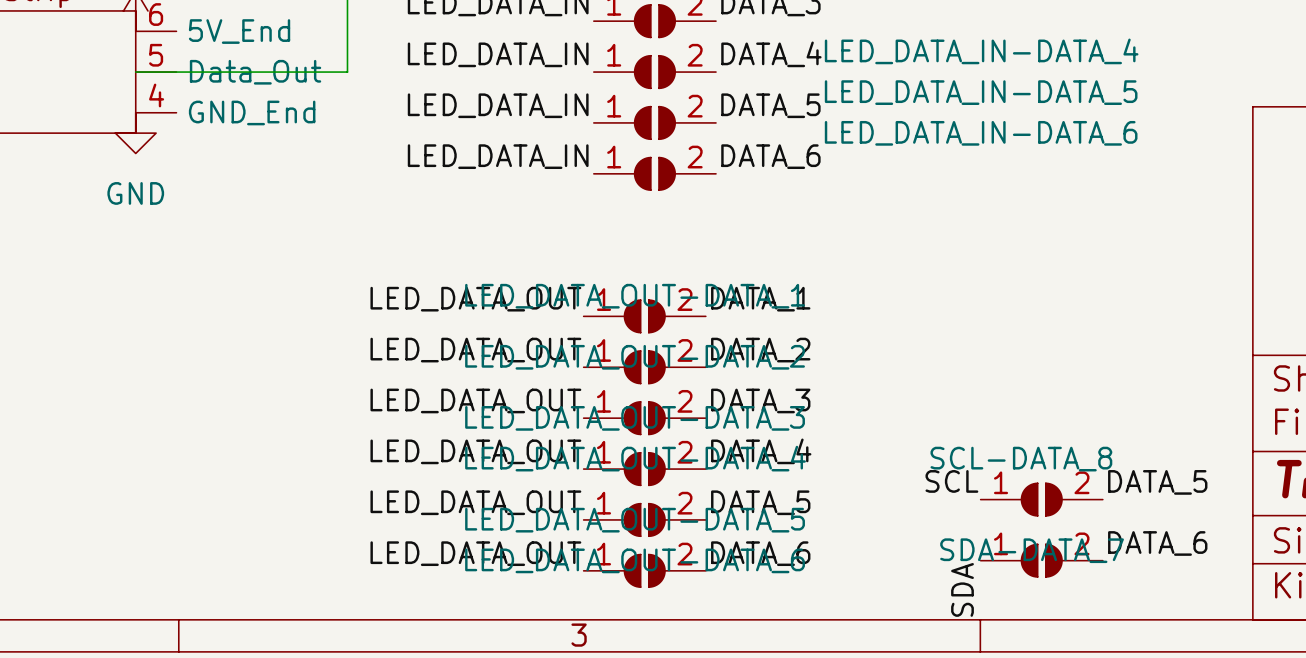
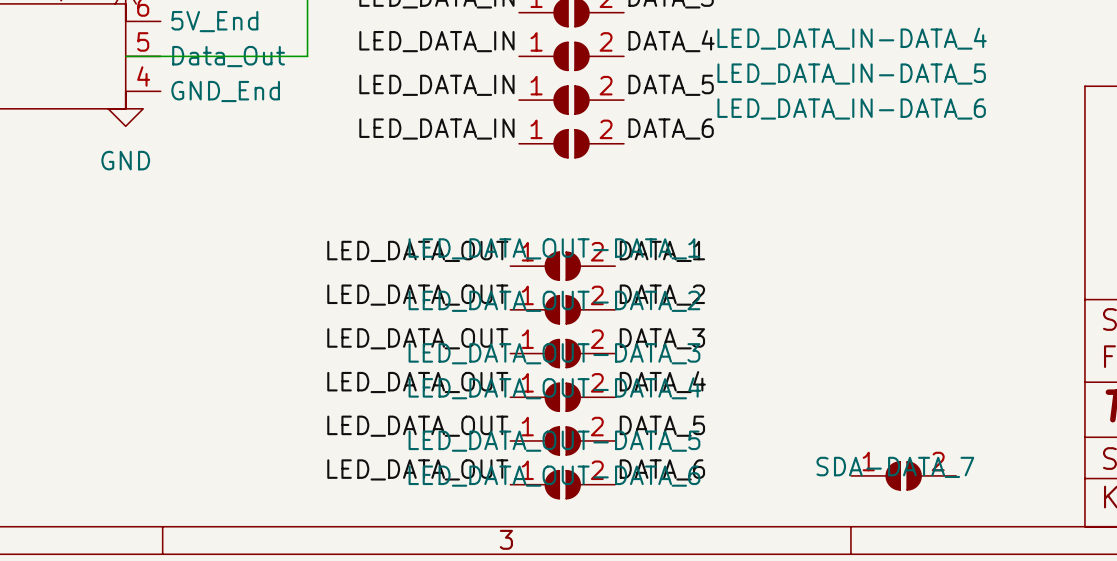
label: SCL (951, 481) -> none
label: DATA_5 (1157, 482) -> none
SCL-DATA_8: (1041, 499) -> none
label: DATA_6 (1157, 543) -> none
label: SDA (962, 589) -> none

